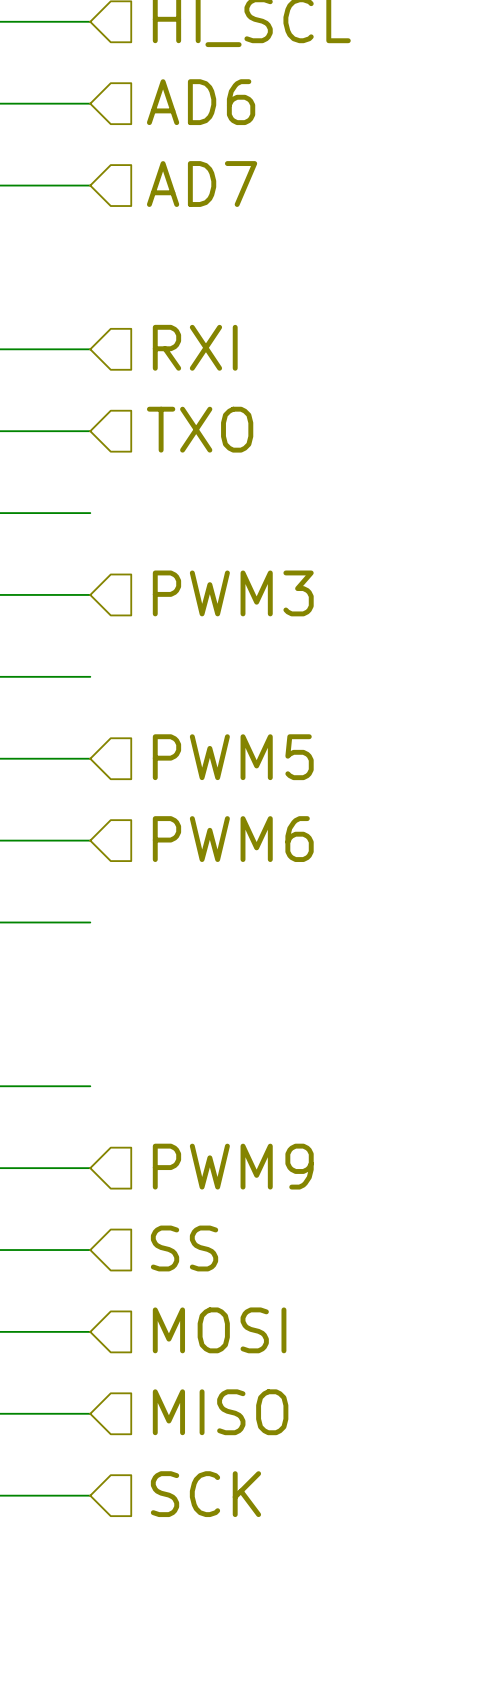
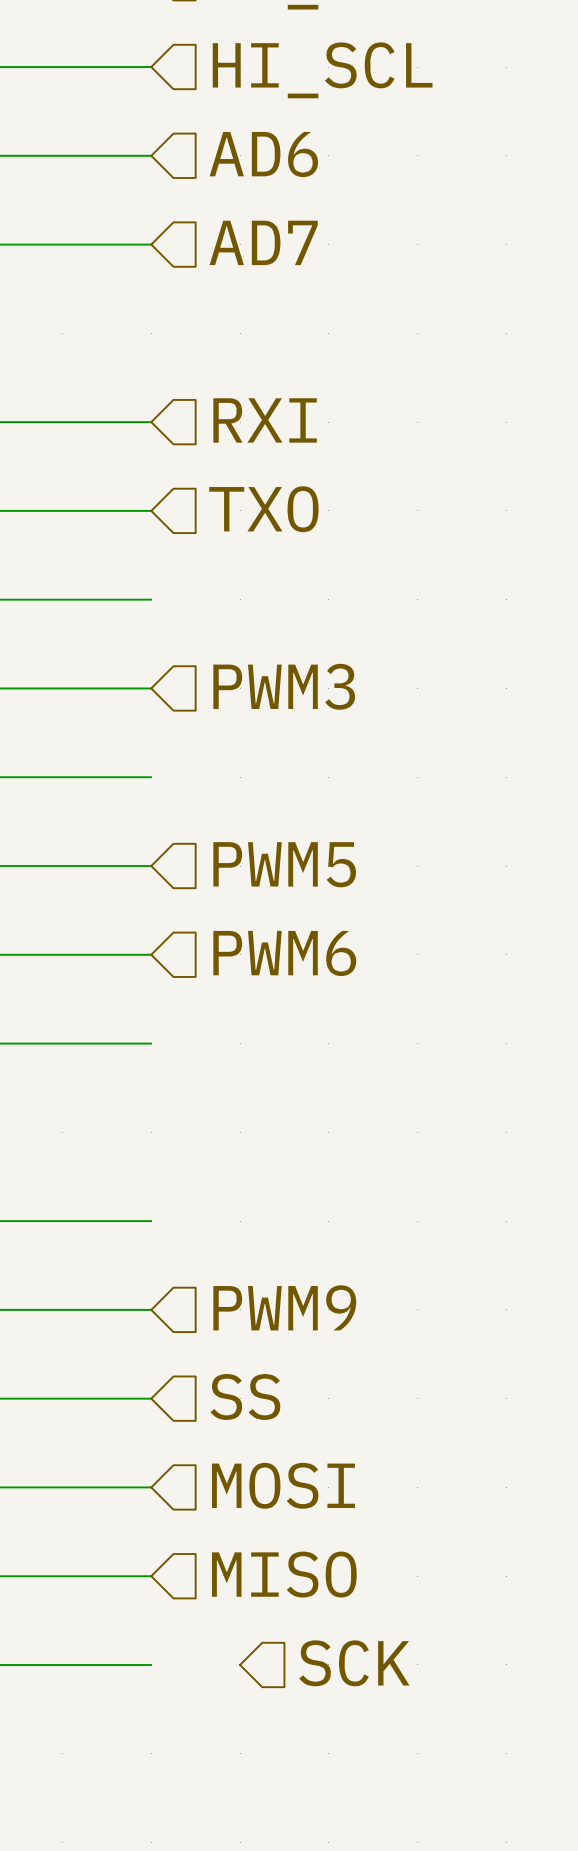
hierarchical label position: SCK (205, 1494) -> SCK (354, 1663)

